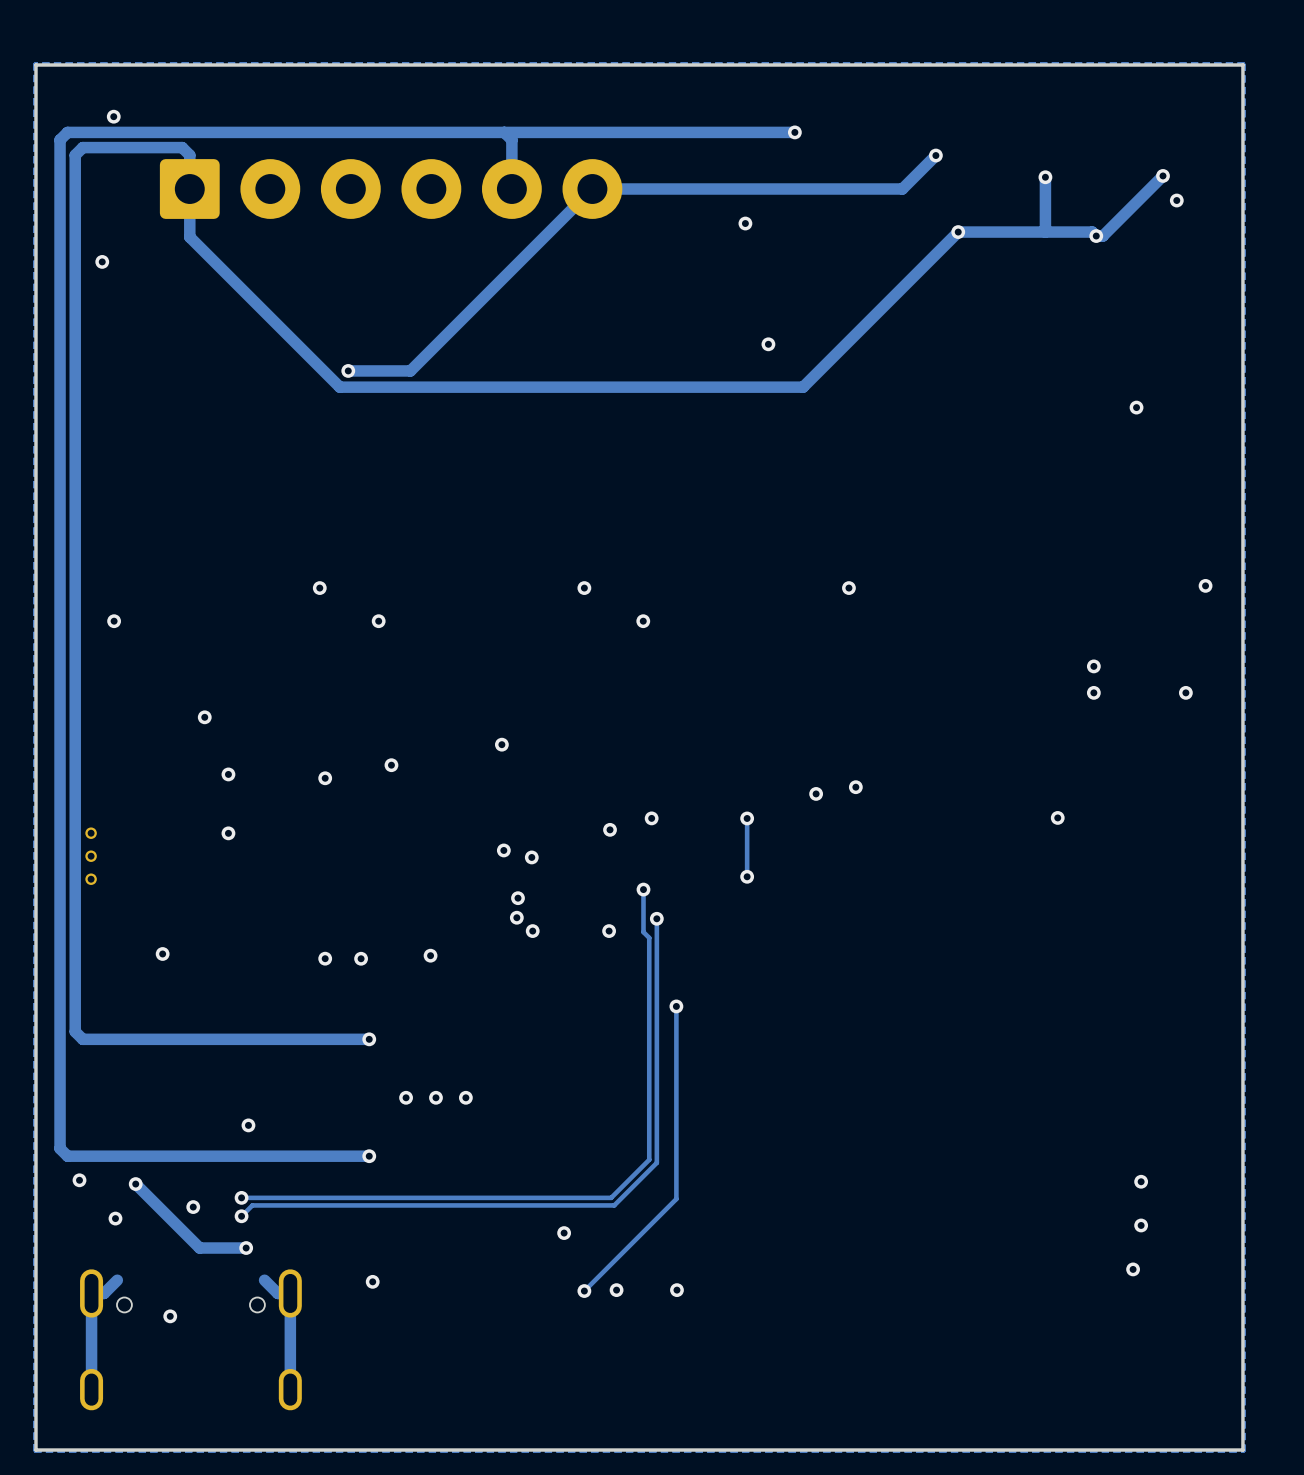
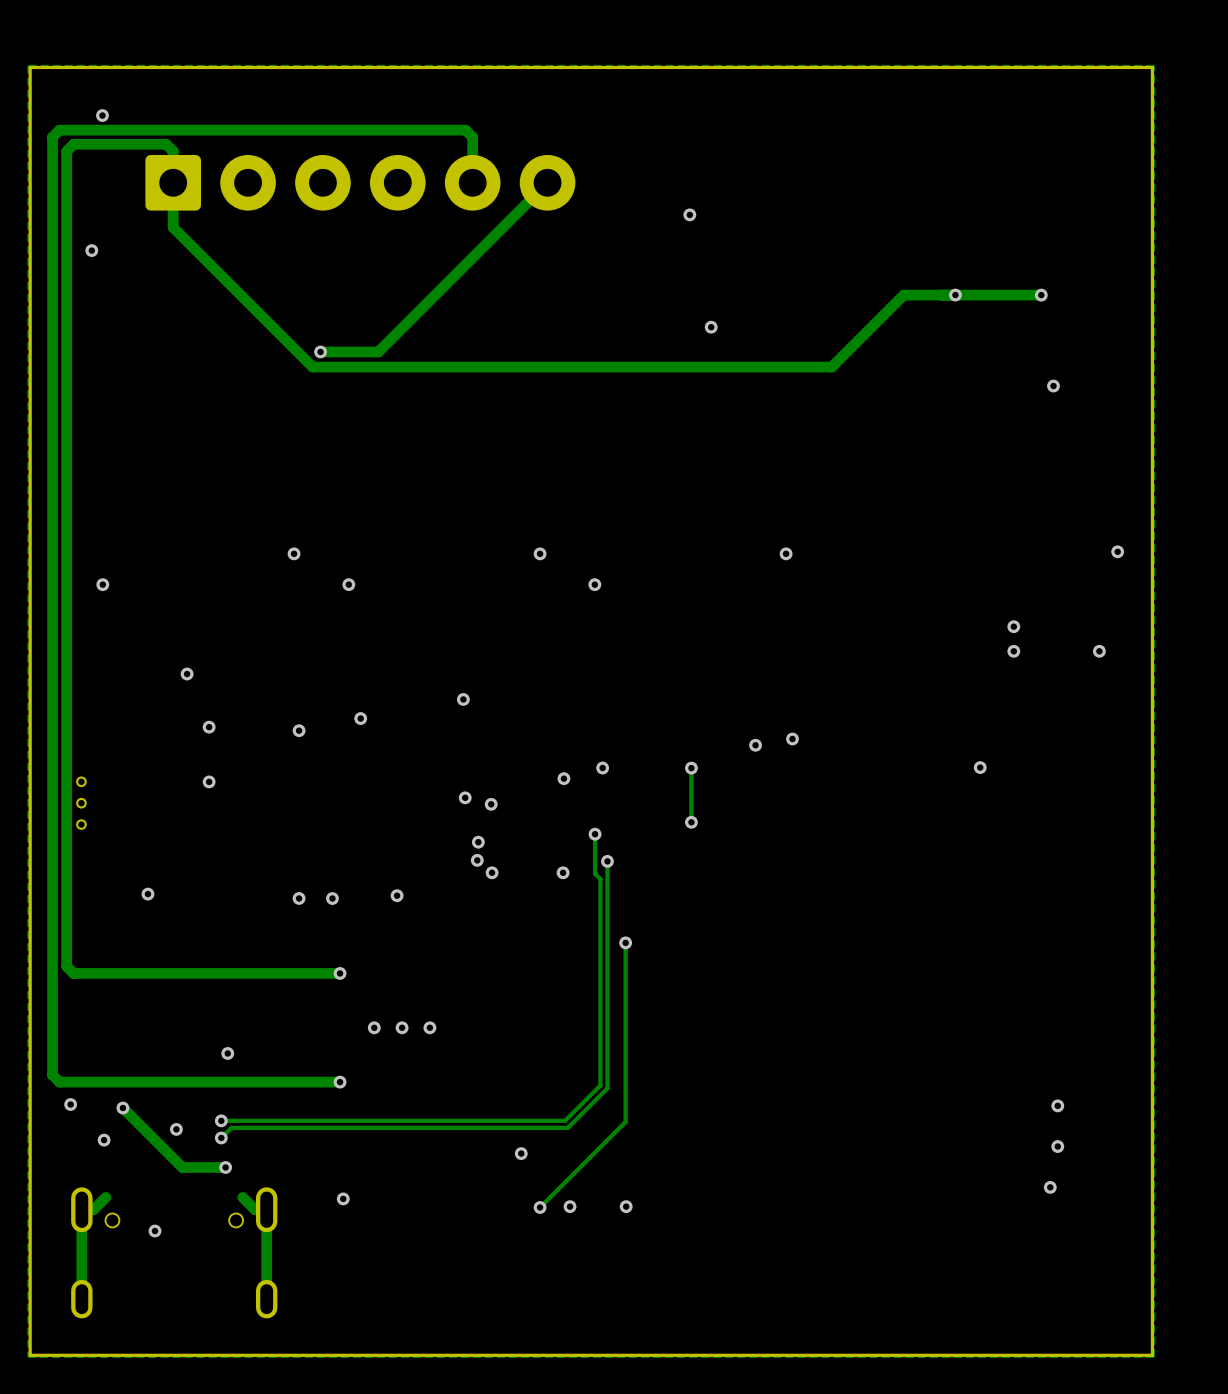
track: (794, 132) (504, 132) -> none
via: (794, 132) -> none
track: (935, 155) (902, 189) (592, 189) -> none
via: (935, 155) -> none
track: (1162, 175) (1102, 236) (1096, 236) (1092, 232) (958, 232) (803, 387) -> (1041, 295) (903, 295) (831, 367) (743, 367)
via: (1162, 175) -> none
track: (1045, 177) (1045, 232) -> none
via: (1045, 177) -> none
via: (1176, 200) -> none
via: (958, 232) -> none
via: (1096, 236) -> none
via: none -> (955, 295)
via: none -> (1041, 295)

